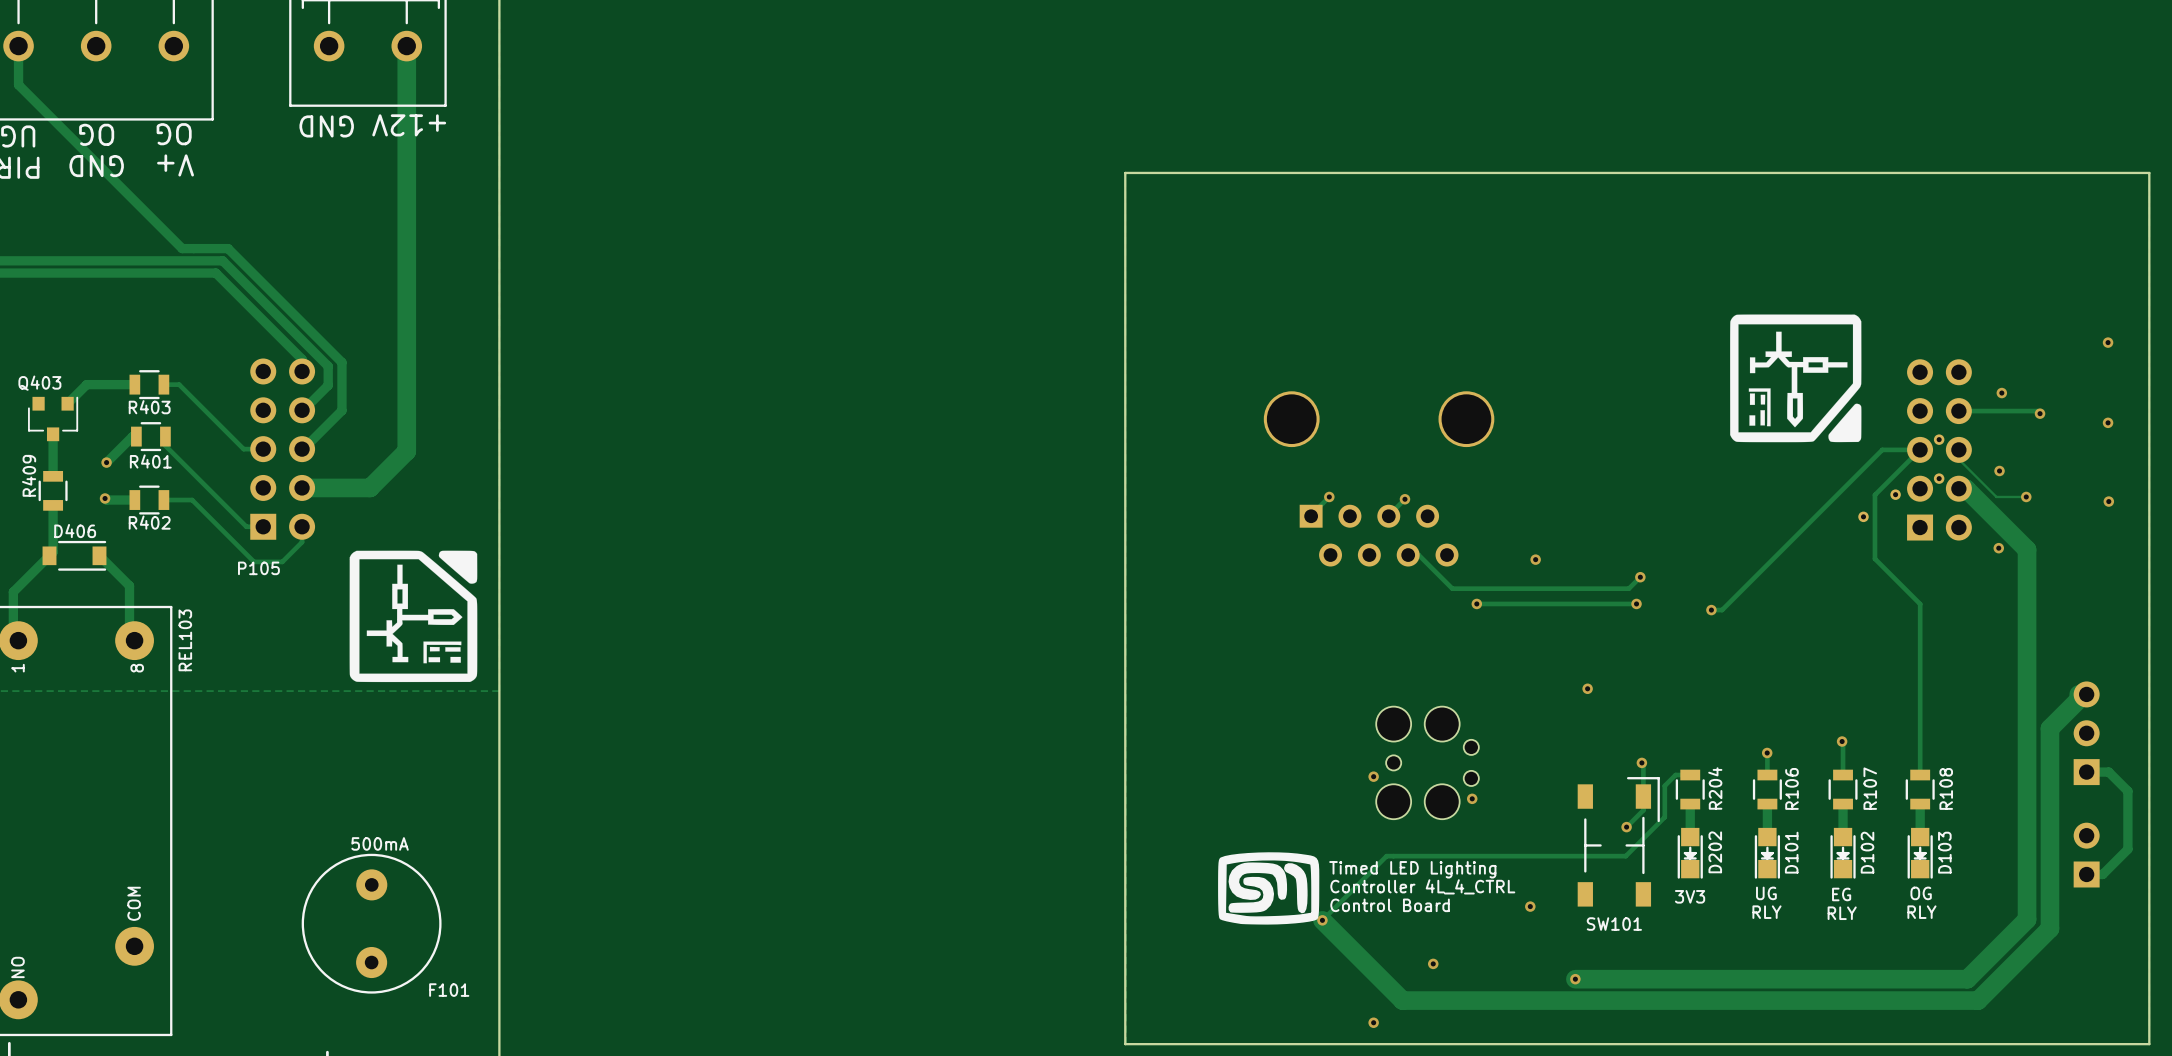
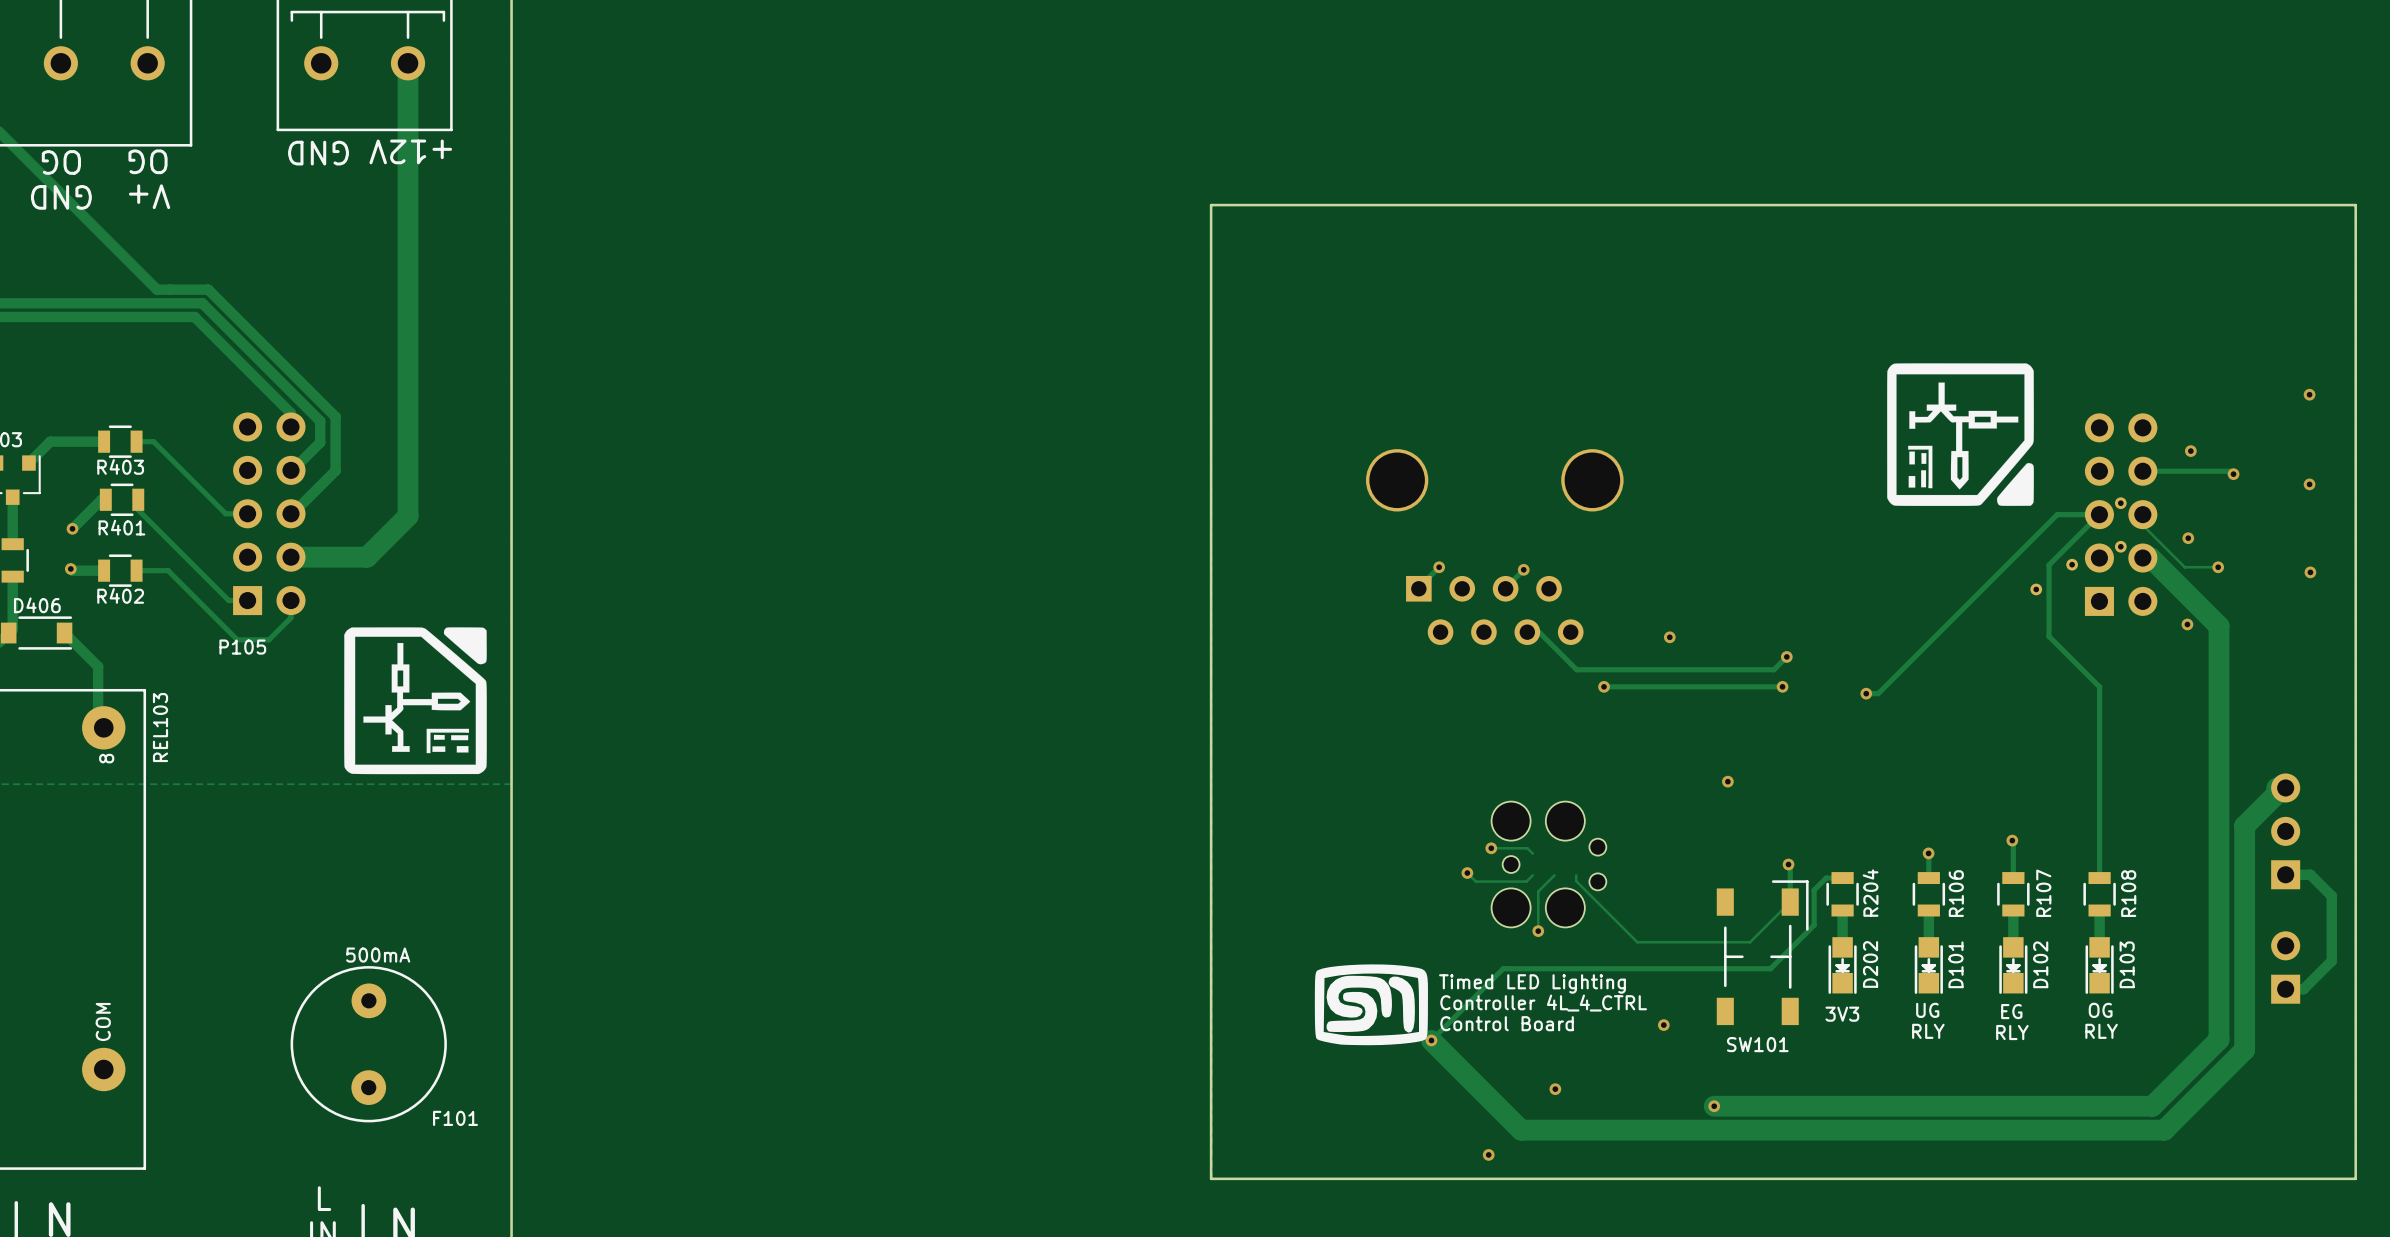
track: none -> (1491, 848) (1527, 848) (1532, 853)
via: none -> (1491, 848)
track: none -> (1467, 873) (1475, 881) (1526, 881) (1532, 875)
via: none -> (1467, 873)
track: none -> (1554, 875) (1538, 891) (1538, 931)
via: (1373, 776) -> none
track: (1643, 796) (1643, 810) (1626, 827) -> (1790, 902) (1750, 942) (1637, 942) (1576, 881) (1576, 875)
via: (1472, 798) -> none
via: none -> (1538, 931)
via: (1626, 827) -> none

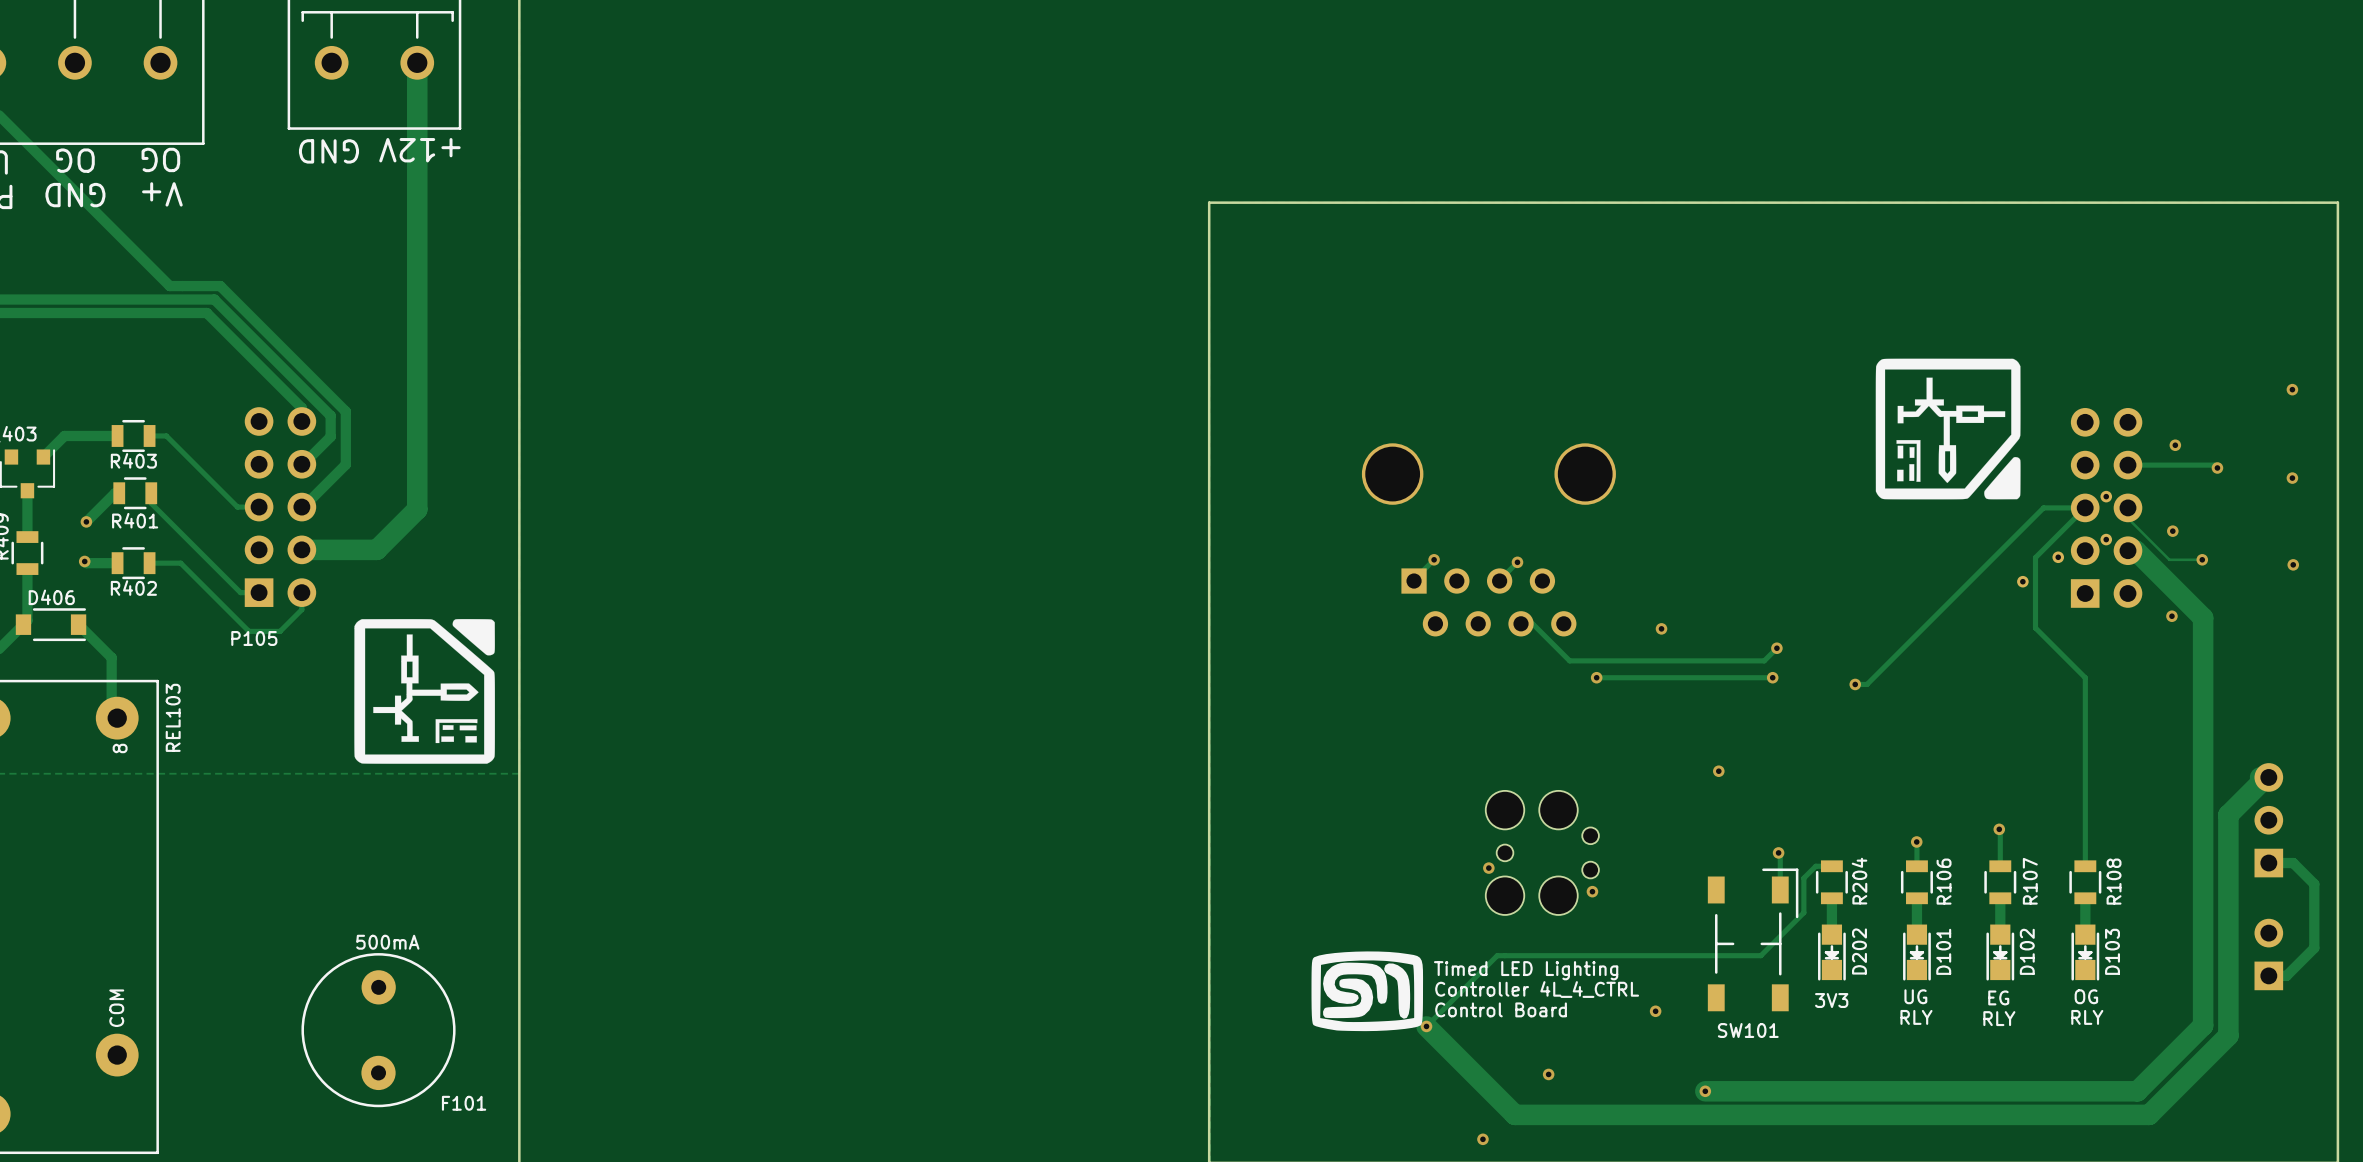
track: (1491, 848) (1527, 848) (1532, 853) -> none
via: (1491, 848) -> none
track: (1467, 873) (1475, 881) (1526, 881) (1532, 875) -> none
via: (1467, 873) -> none
track: (1554, 875) (1538, 891) (1538, 931) -> none
track: (1576, 875) (1576, 881) (1637, 942) (1750, 942) (1790, 902) -> none
via: none -> (1488, 868)
via: none -> (1592, 891)
via: (1538, 931) -> none

